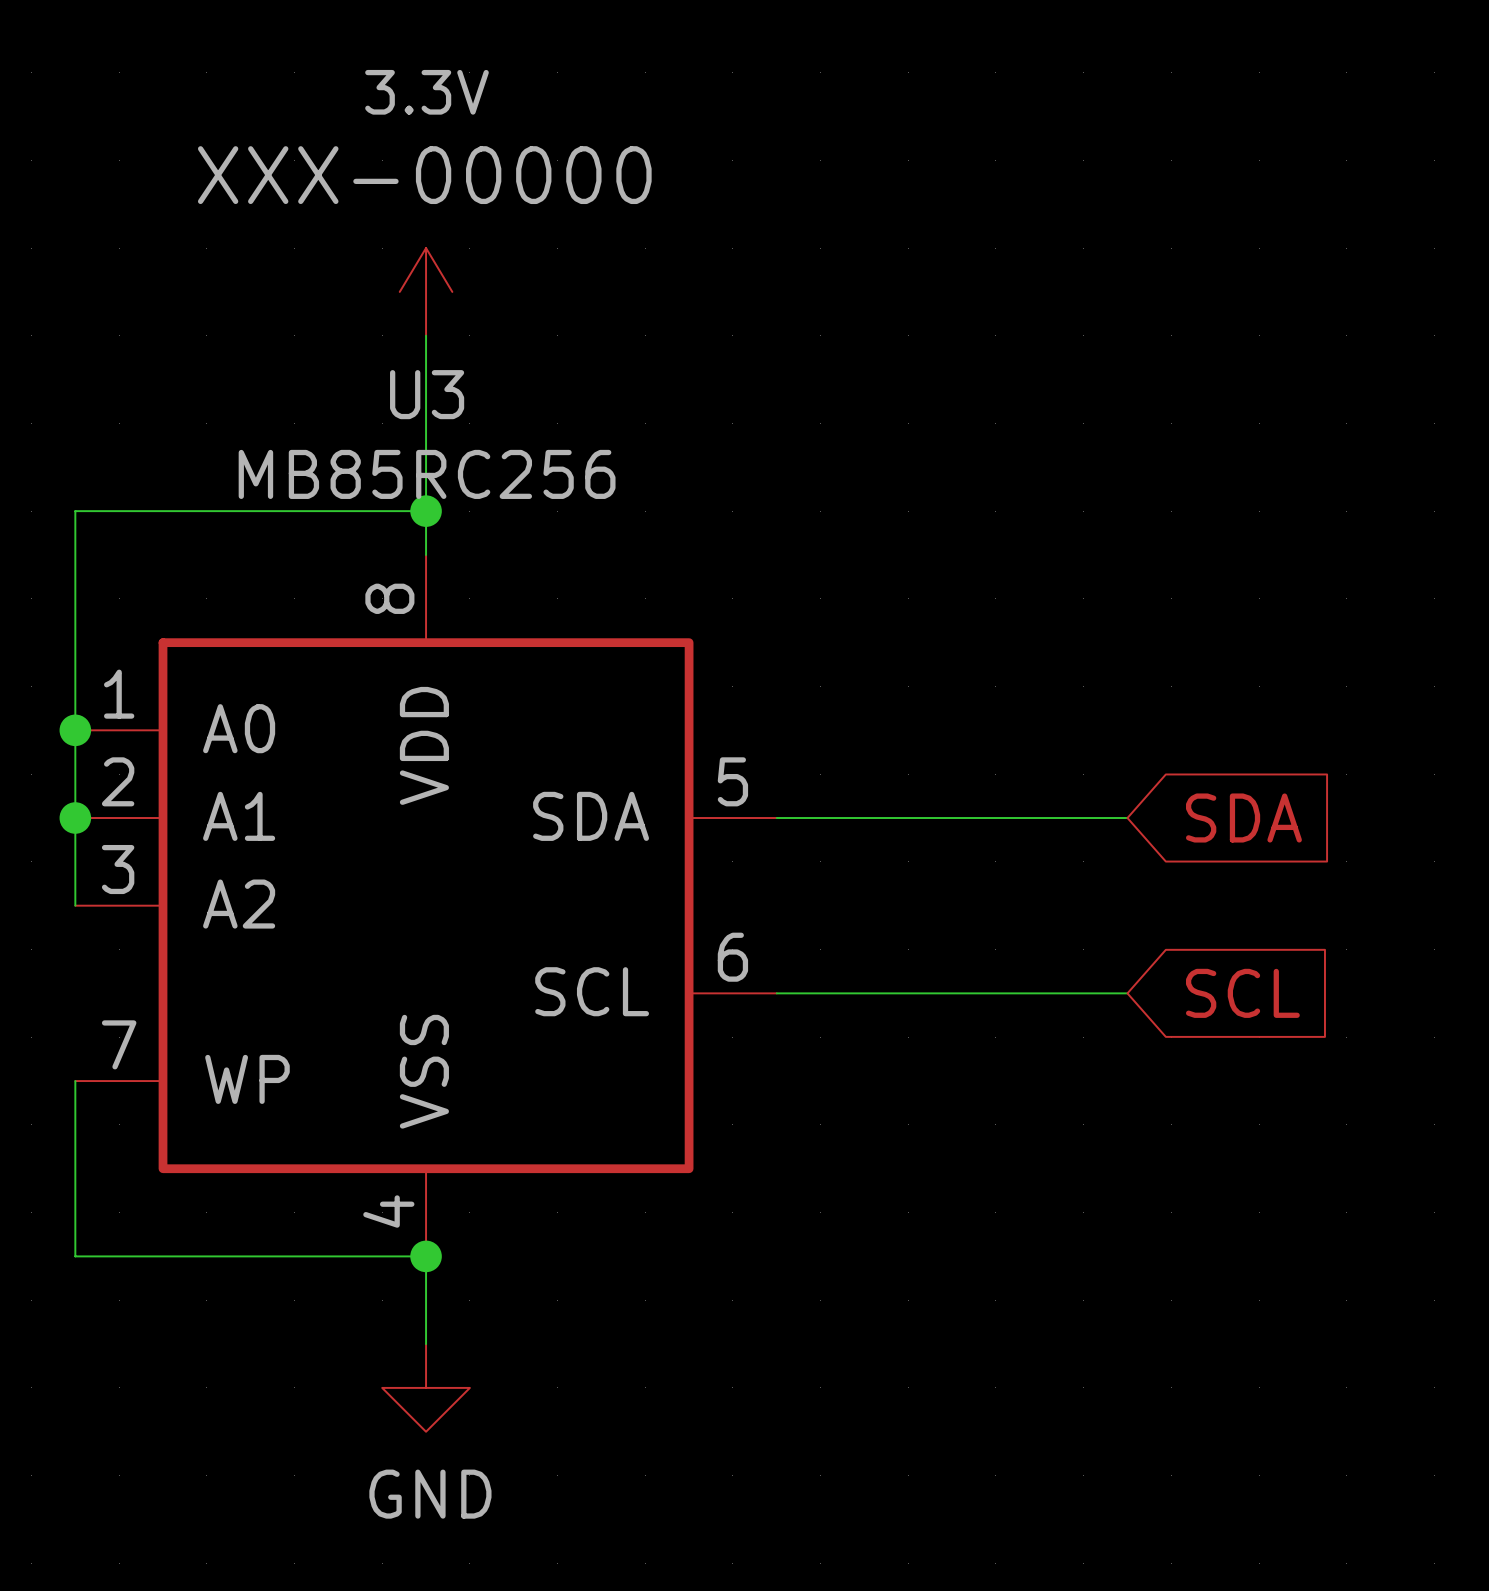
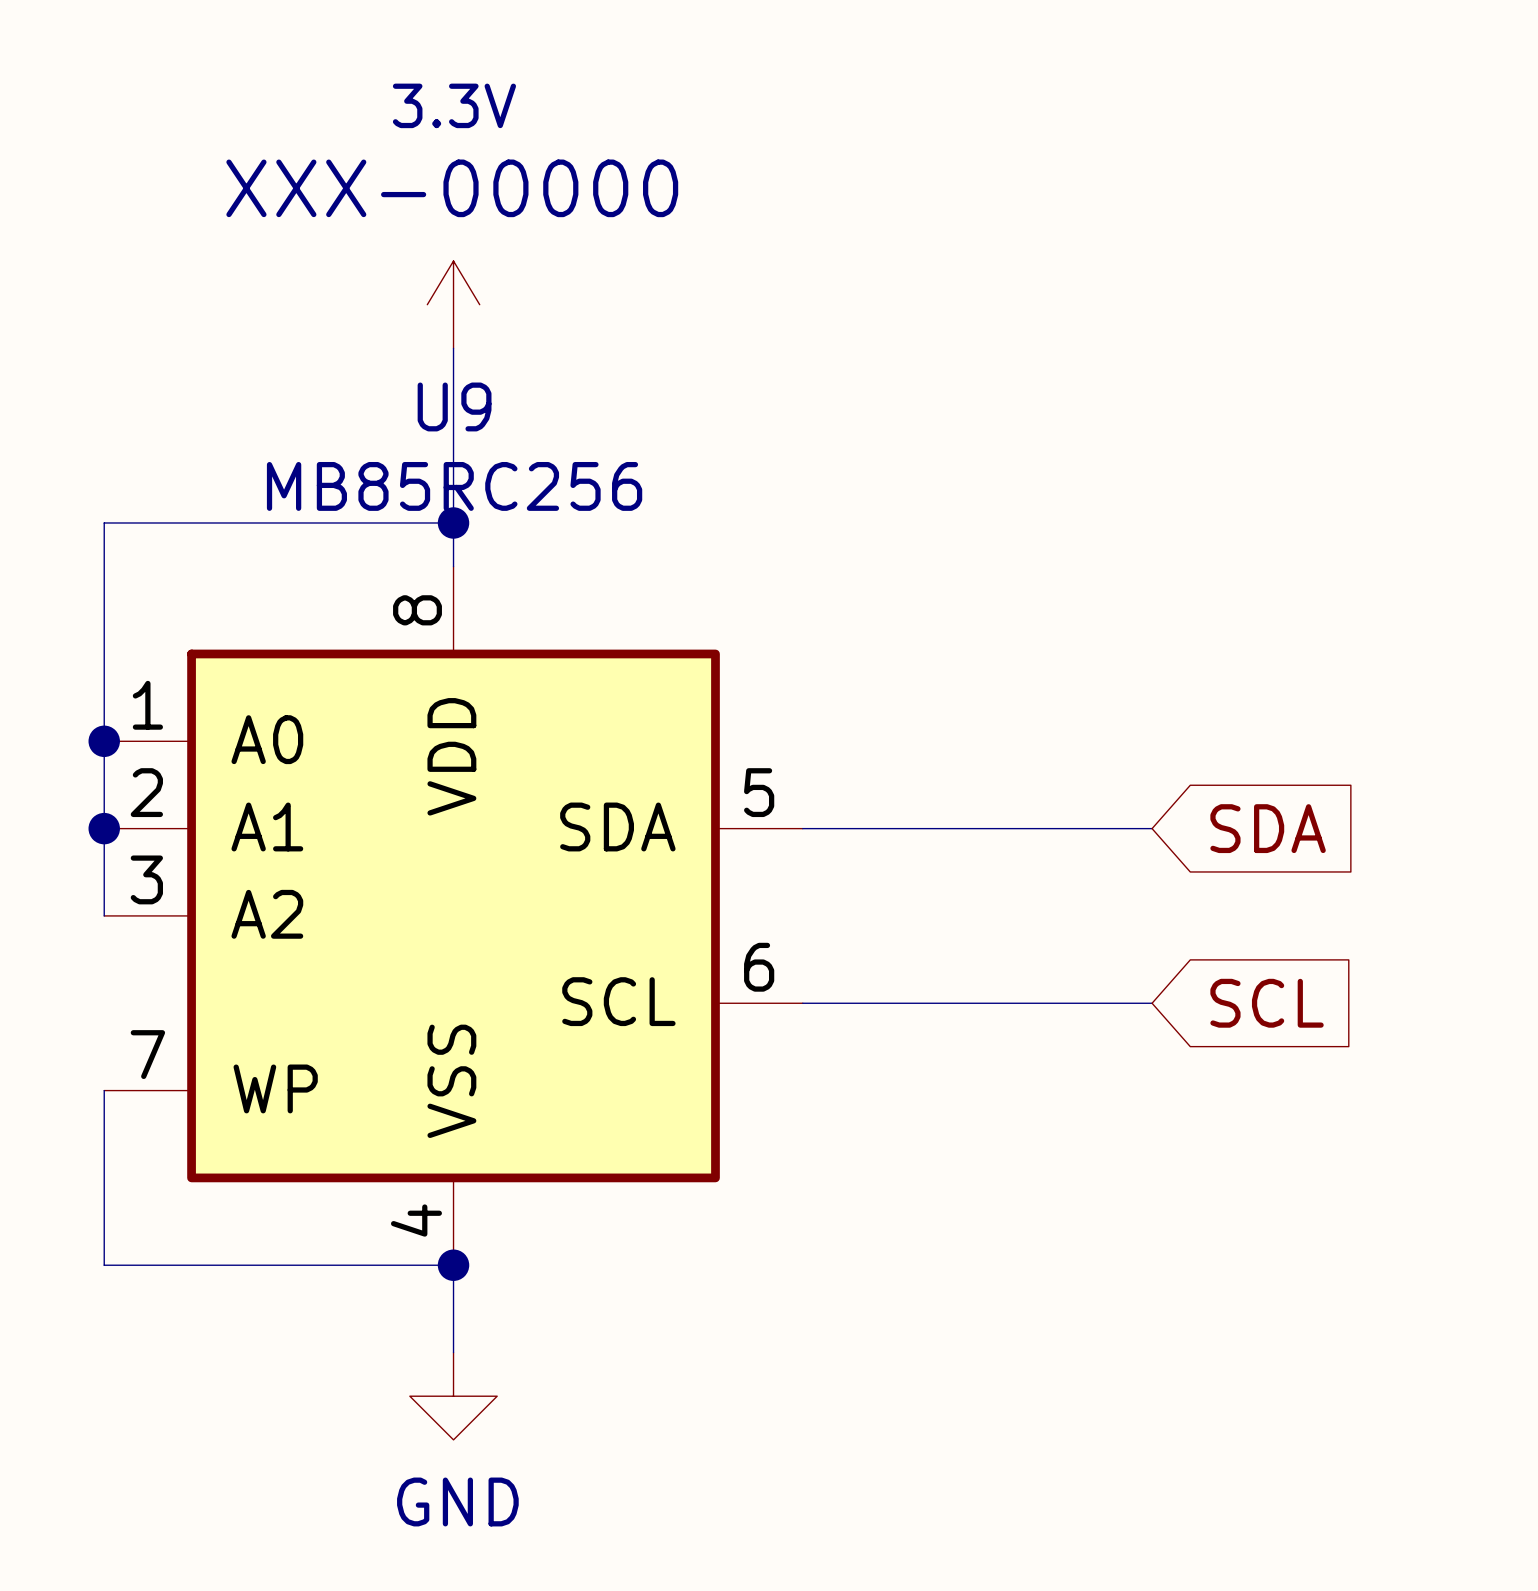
U3 name: U3 (427, 394) -> U9 (454, 406)

